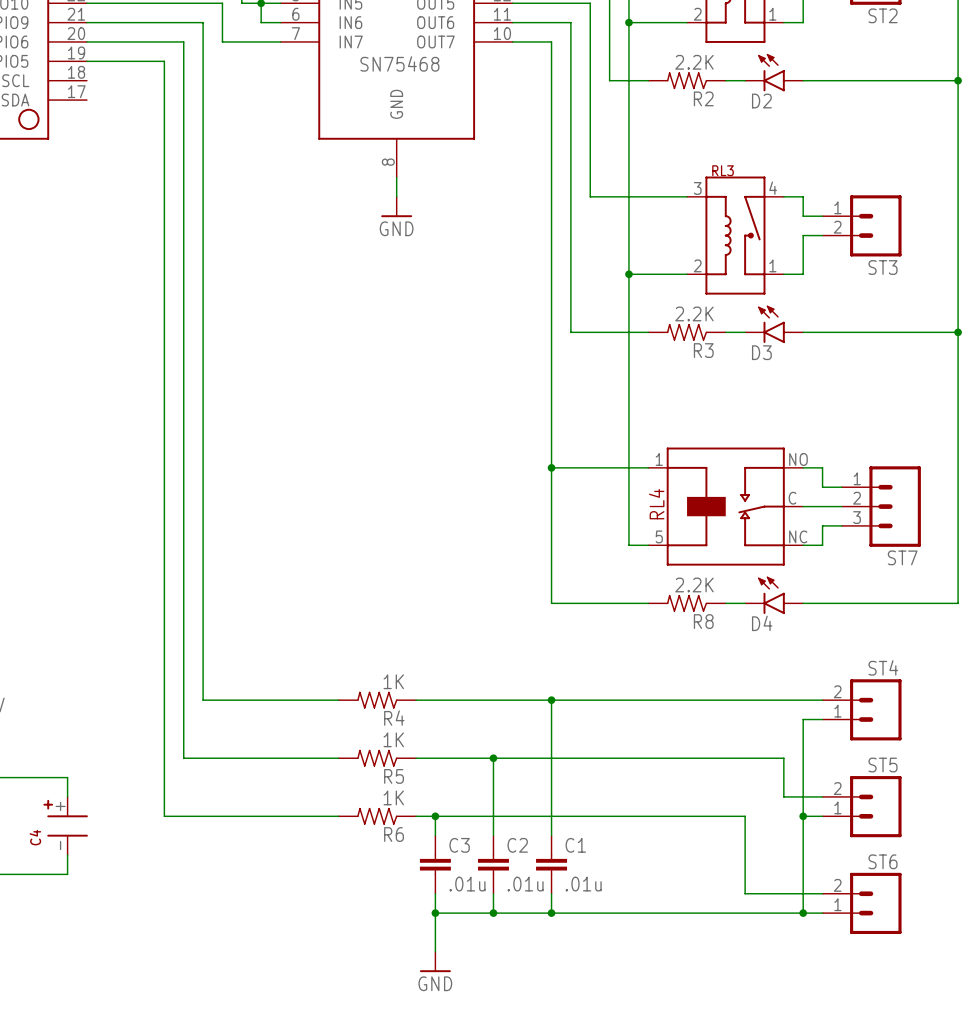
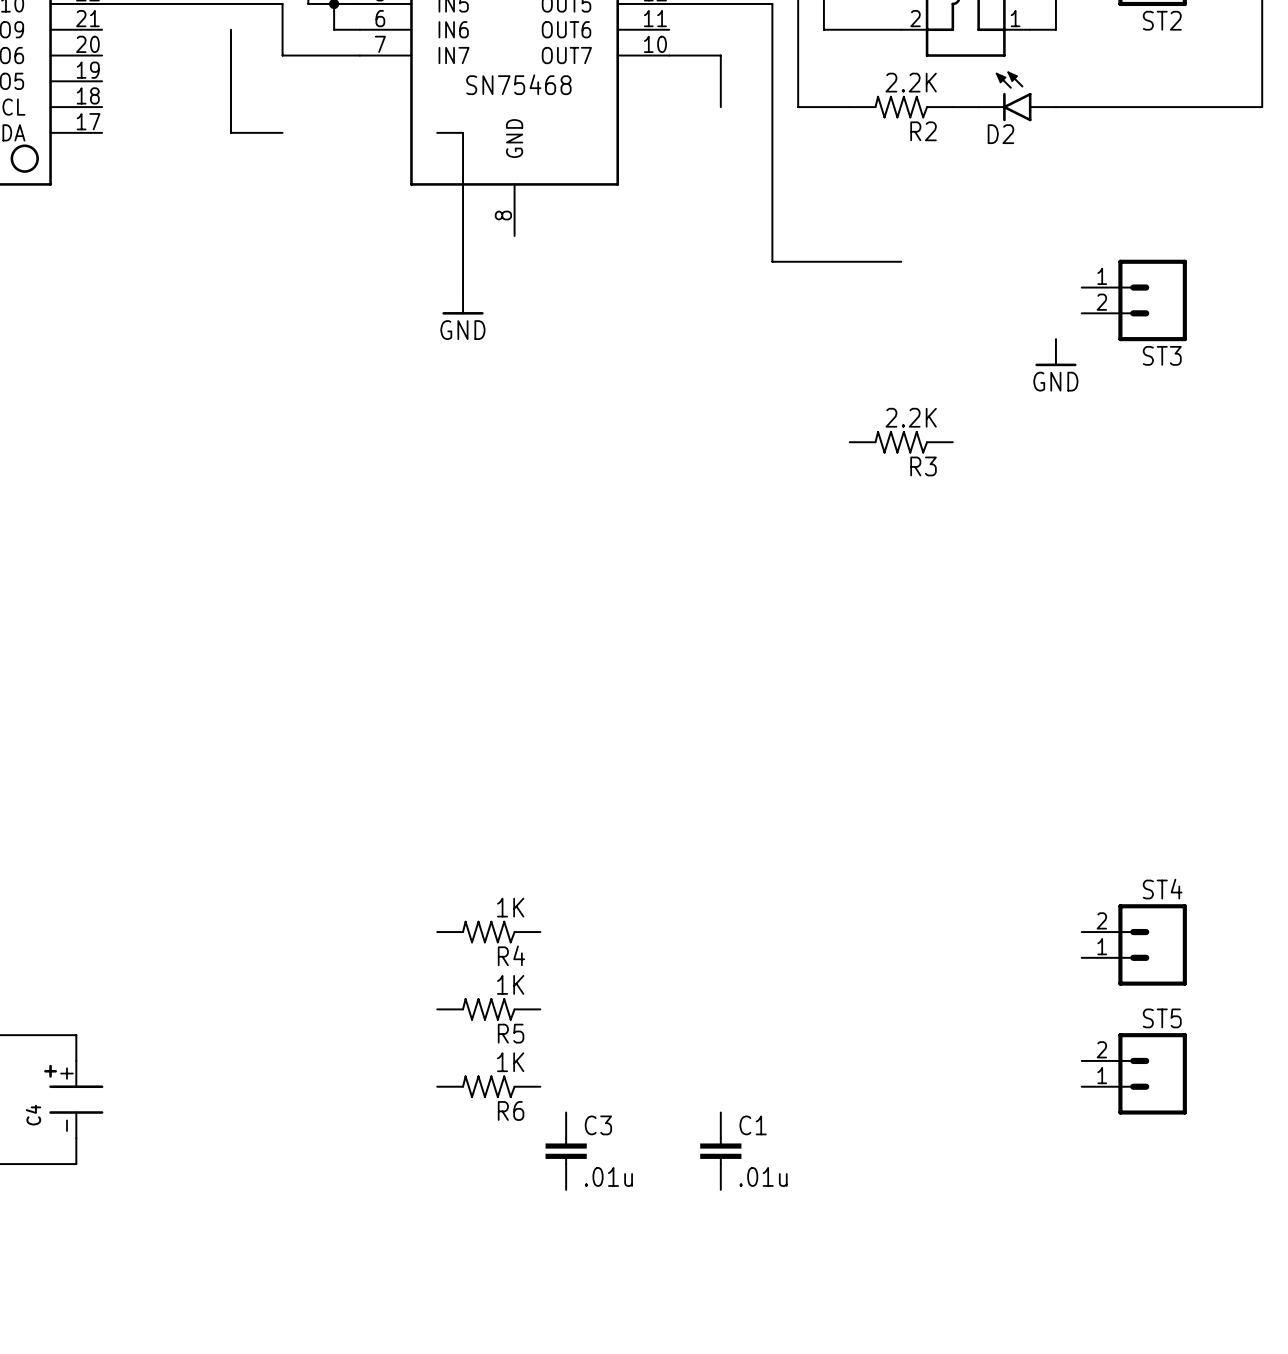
wire: (86, 22) (203, 22) (203, 700) (338, 700) -> none
wire: (512, 22) (570, 22) (570, 332) (648, 332) -> none
wire: (628, 22) (628, 545) (648, 545) -> none
junction: (628, 22) -> none
wire: (86, 41) (183, 41) -> (231, 29) (231, 55)
wire: (86, 61) (164, 61) (164, 816) (338, 816) -> none
wire: (551, 80) (551, 603) (648, 603) -> none
wire: (958, 80) (958, 603) (803, 603) -> none
junction: (958, 80) -> none
wire: (183, 100) (183, 758) (338, 758) -> (231, 132) (282, 132)
wire: none -> (437, 132) (463, 132) (463, 287)
wire: (396, 177) (396, 196) -> none
wire: (783, 196) (803, 196) (803, 216) (822, 216) -> none
power symbol position: GND (396, 207) -> GND (463, 301)
RL3: (735, 235) -> none
wire: (822, 235) (803, 235) (803, 274) (783, 274) -> none
power symbol: none -> GND (1055, 352)
wire: (628, 274) (687, 274) -> none
junction: (628, 274) -> none
D3: (774, 324) -> none
wire: (725, 332) (745, 332) -> none
wire: (803, 332) (958, 332) -> none
junction: (958, 332) -> none
wire: (551, 467) (648, 467) -> none
junction: (551, 467) -> none
wire: (803, 467) (822, 467) (822, 487) (841, 487) -> none
RL4: (725, 506) -> none
wire: (803, 506) (841, 506) -> none
ST7: (881, 506) -> none
wire: (841, 525) (822, 525) (822, 545) (803, 545) -> none
D4: (774, 595) -> none
R8: 2.2K (687, 603) -> none
wire: (725, 603) (745, 603) -> none
wire: (416, 700) (822, 700) -> none
wire: (551, 700) (551, 835) -> none
junction: (551, 700) -> none
wire: (822, 719) (803, 719) (803, 913) -> none
wire: (416, 758) (783, 758) (783, 796) (822, 796) -> none
wire: (493, 758) (493, 835) -> none
junction: (493, 758) -> none
wire: (416, 816) (745, 816) (745, 893) (822, 893) -> none
wire: (435, 816) (435, 835) -> none
junction: (435, 816) -> none
wire: (803, 816) (822, 816) -> none
junction: (803, 816) -> none
C2: .01u (493, 864) -> none
wire: (435, 893) (435, 951) -> none
wire: (493, 893) (493, 913) -> none
wire: (551, 893) (551, 913) -> none
ST6: (862, 903) -> none
wire: (435, 913) (822, 913) -> none
junction: (435, 913) -> none
junction: (493, 913) -> none
junction: (551, 913) -> none
junction: (803, 913) -> none
power symbol: GND (435, 961) -> none

